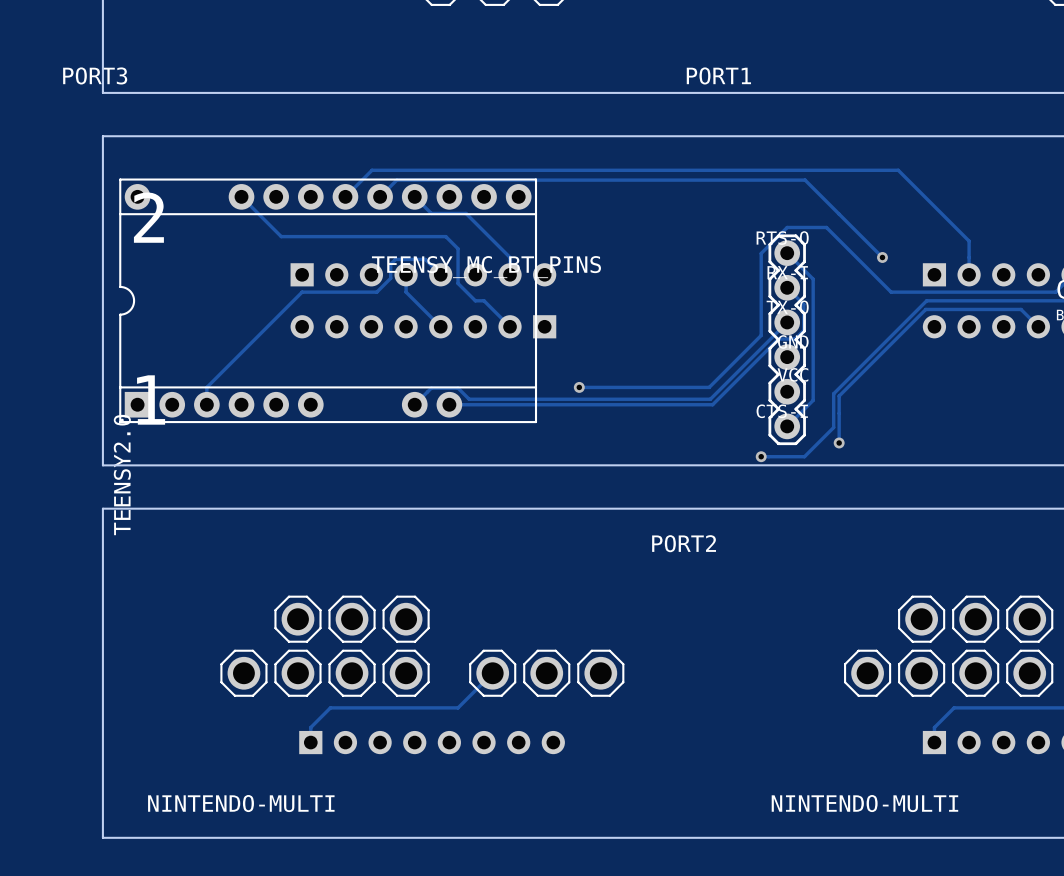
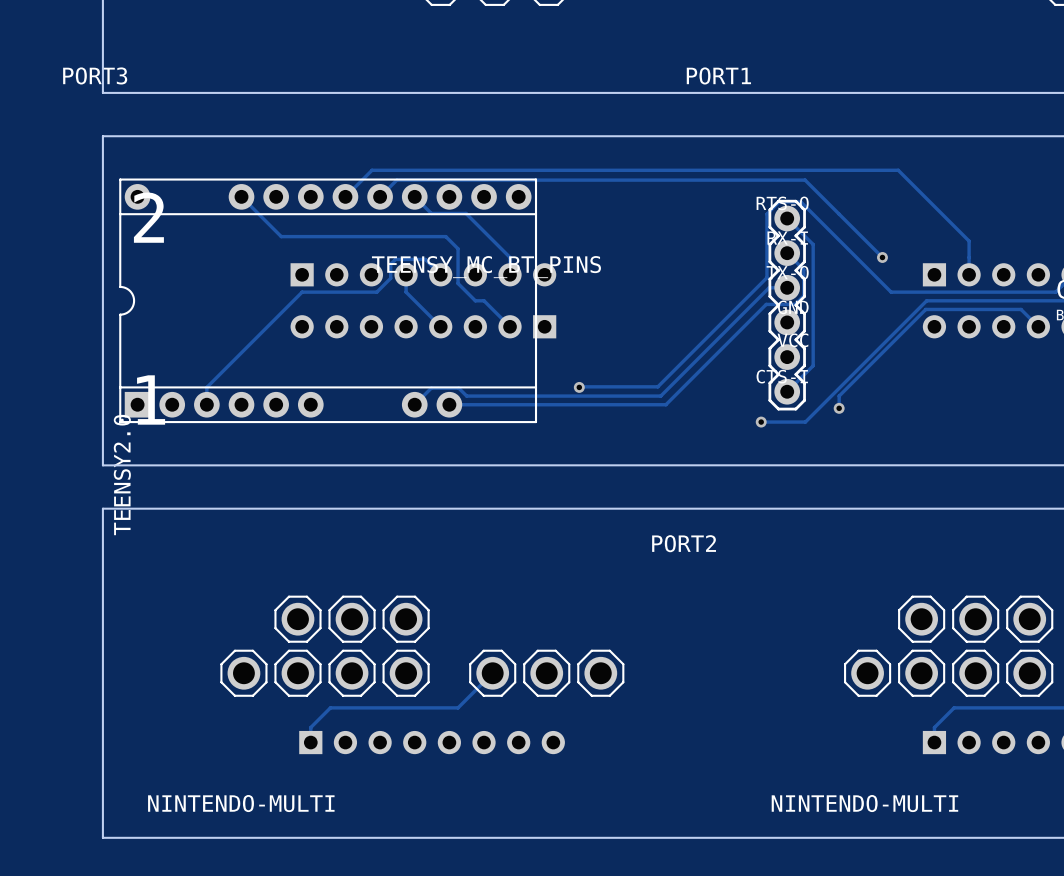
track: (826, 227) (787, 227) (761, 253) (761, 335) (709, 387) (579, 387) -> (826, 227) (800, 201) (779, 201) (766, 214) (766, 277) (657, 386) (579, 386)
track: (803, 269) (813, 279) -> (787, 218) (813, 244) (813, 279)
track: (787, 287) (803, 304) (803, 330) (795, 339) (778, 339) (712, 404) (665, 404) -> (803, 269) (803, 295) (795, 304) (766, 304) (665, 404)
track: (787, 322) (710, 399) (469, 399) (458, 388) -> (787, 287) (769, 287) (660, 396) (466, 396) (458, 388)
part position: (787, 339) -> (787, 305)
track: (813, 365) (813, 400) (787, 426) -> (813, 365) (787, 391)
track: (833, 393) (833, 427) (804, 456) (761, 456) -> (833, 393) (805, 422) (761, 422)
track: (839, 408) (839, 442) -> none
via position: (839, 442) -> (839, 408)
via position: (761, 456) -> (761, 422)

